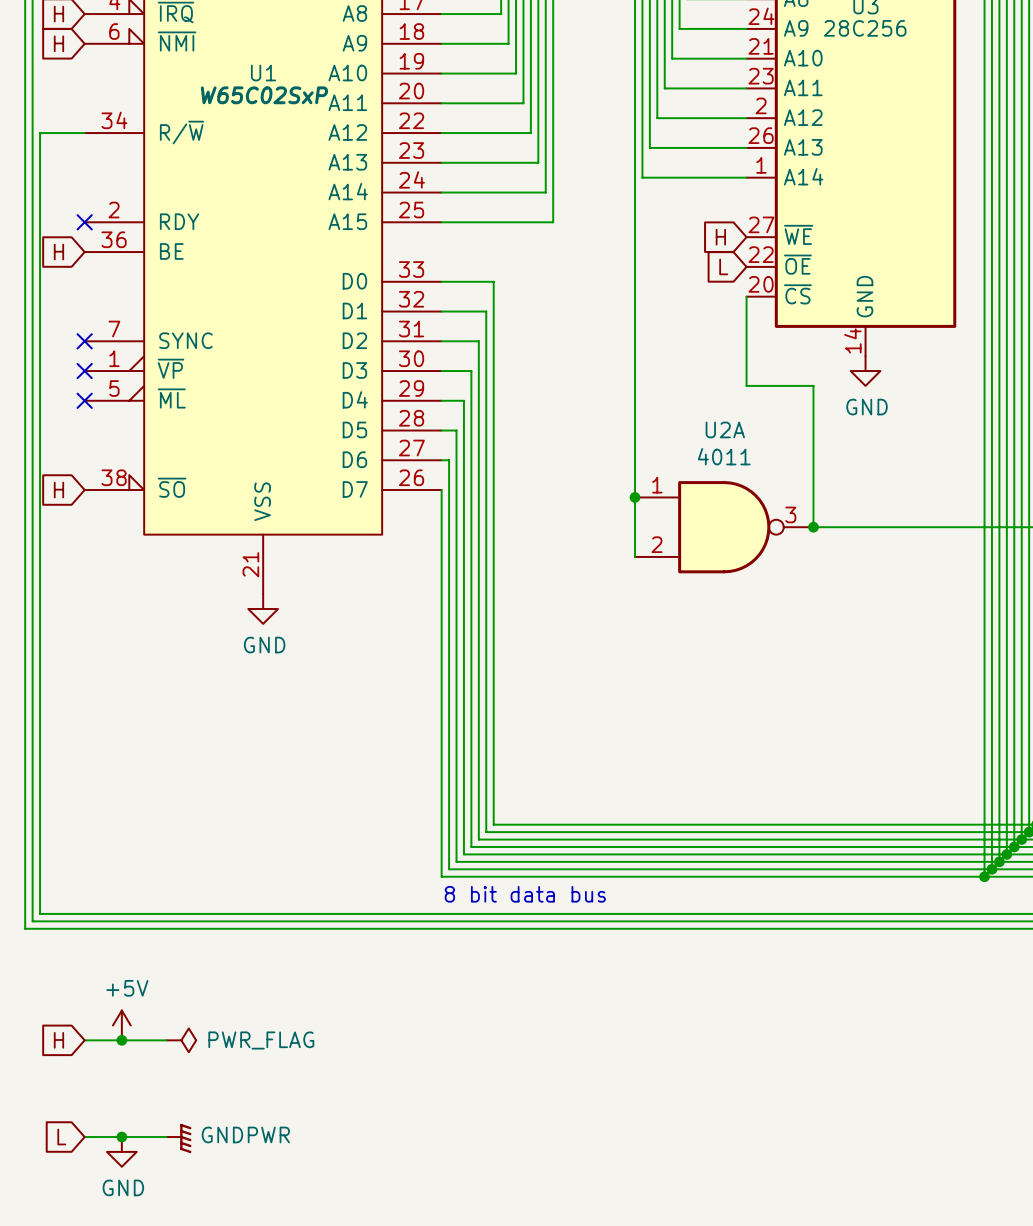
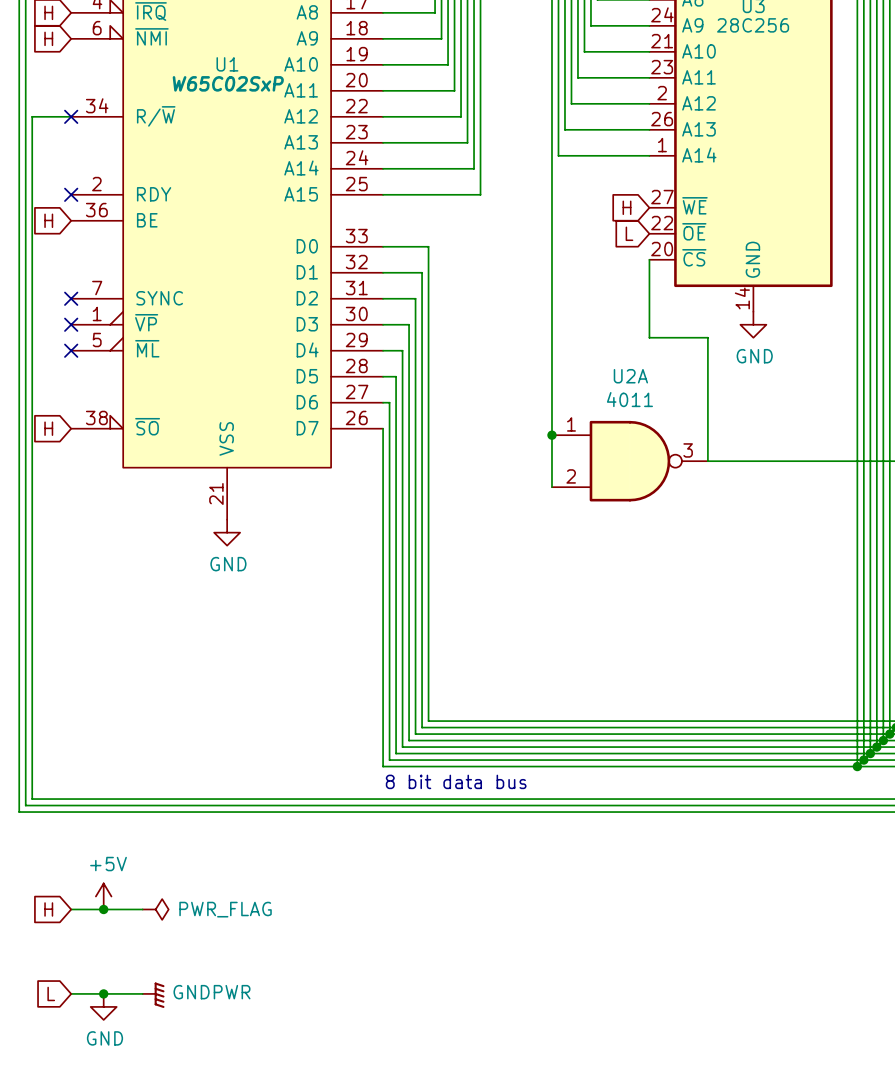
no-connect mark: none -> (71, 116)
junction: (813, 527) -> none

